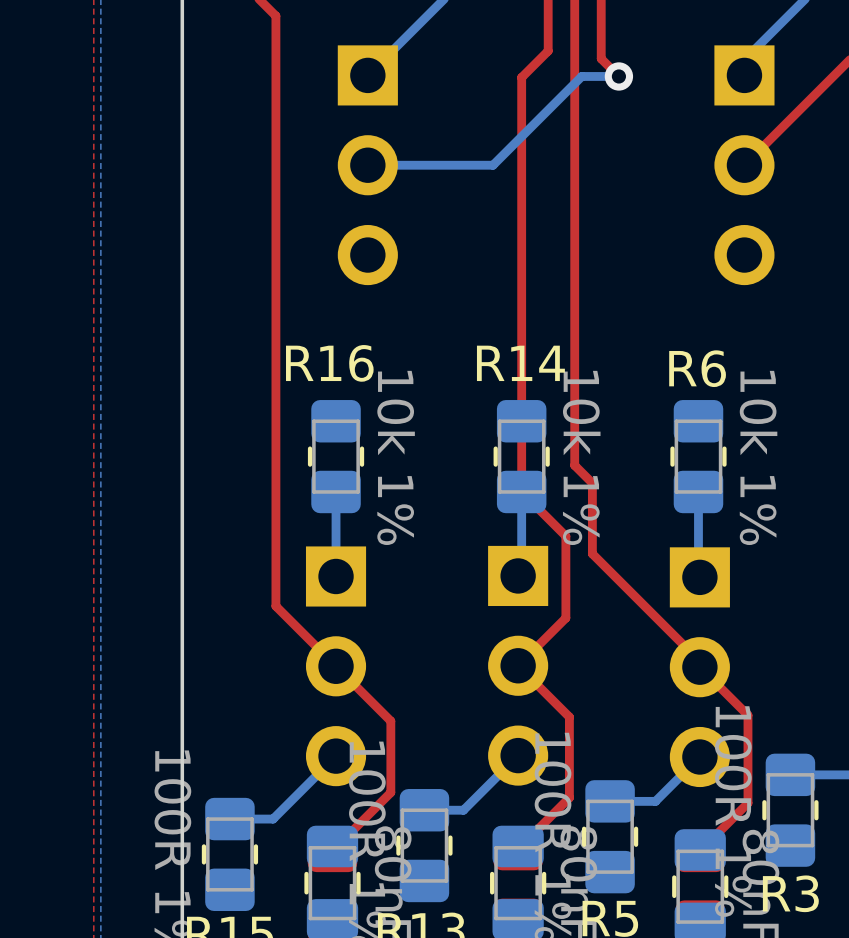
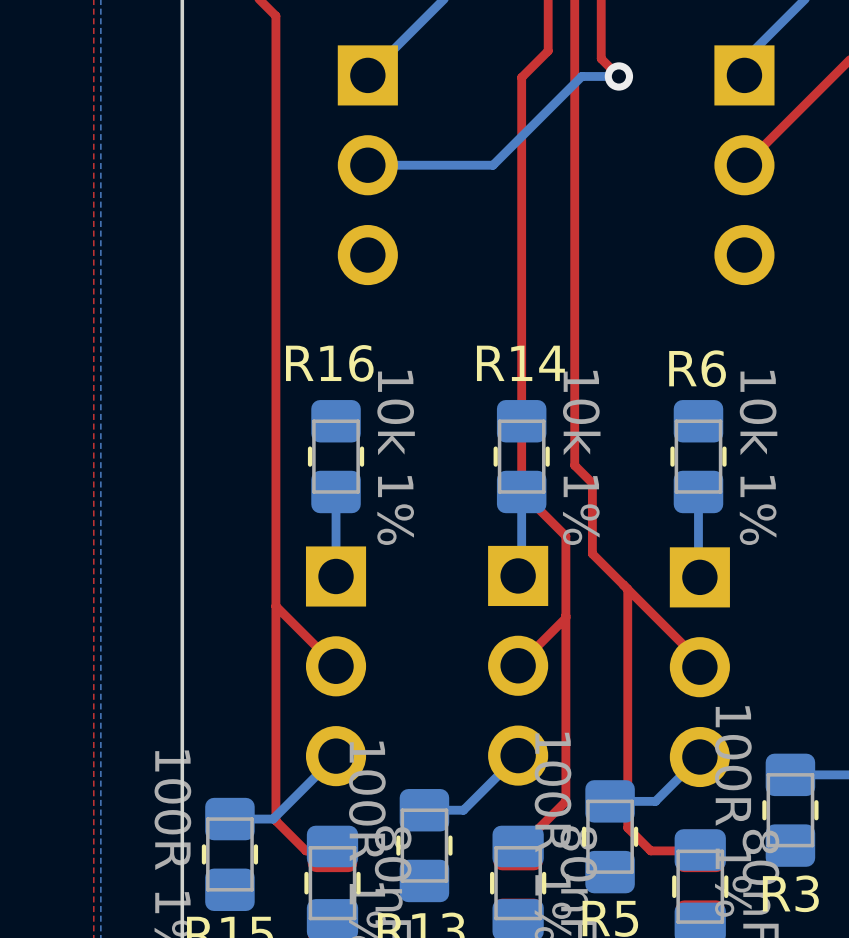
top track: (518, 665) (569, 717) (569, 797) (565, 801) -> (565, 618) (565, 801)
top track: (336, 666) (390, 721) (390, 792) (332, 850) -> (275, 606) (275, 820) (305, 850) (332, 850)
top track: (699, 667) (747, 715) (747, 803) (700, 850) -> (627, 589) (627, 827) (650, 850) (700, 850)

